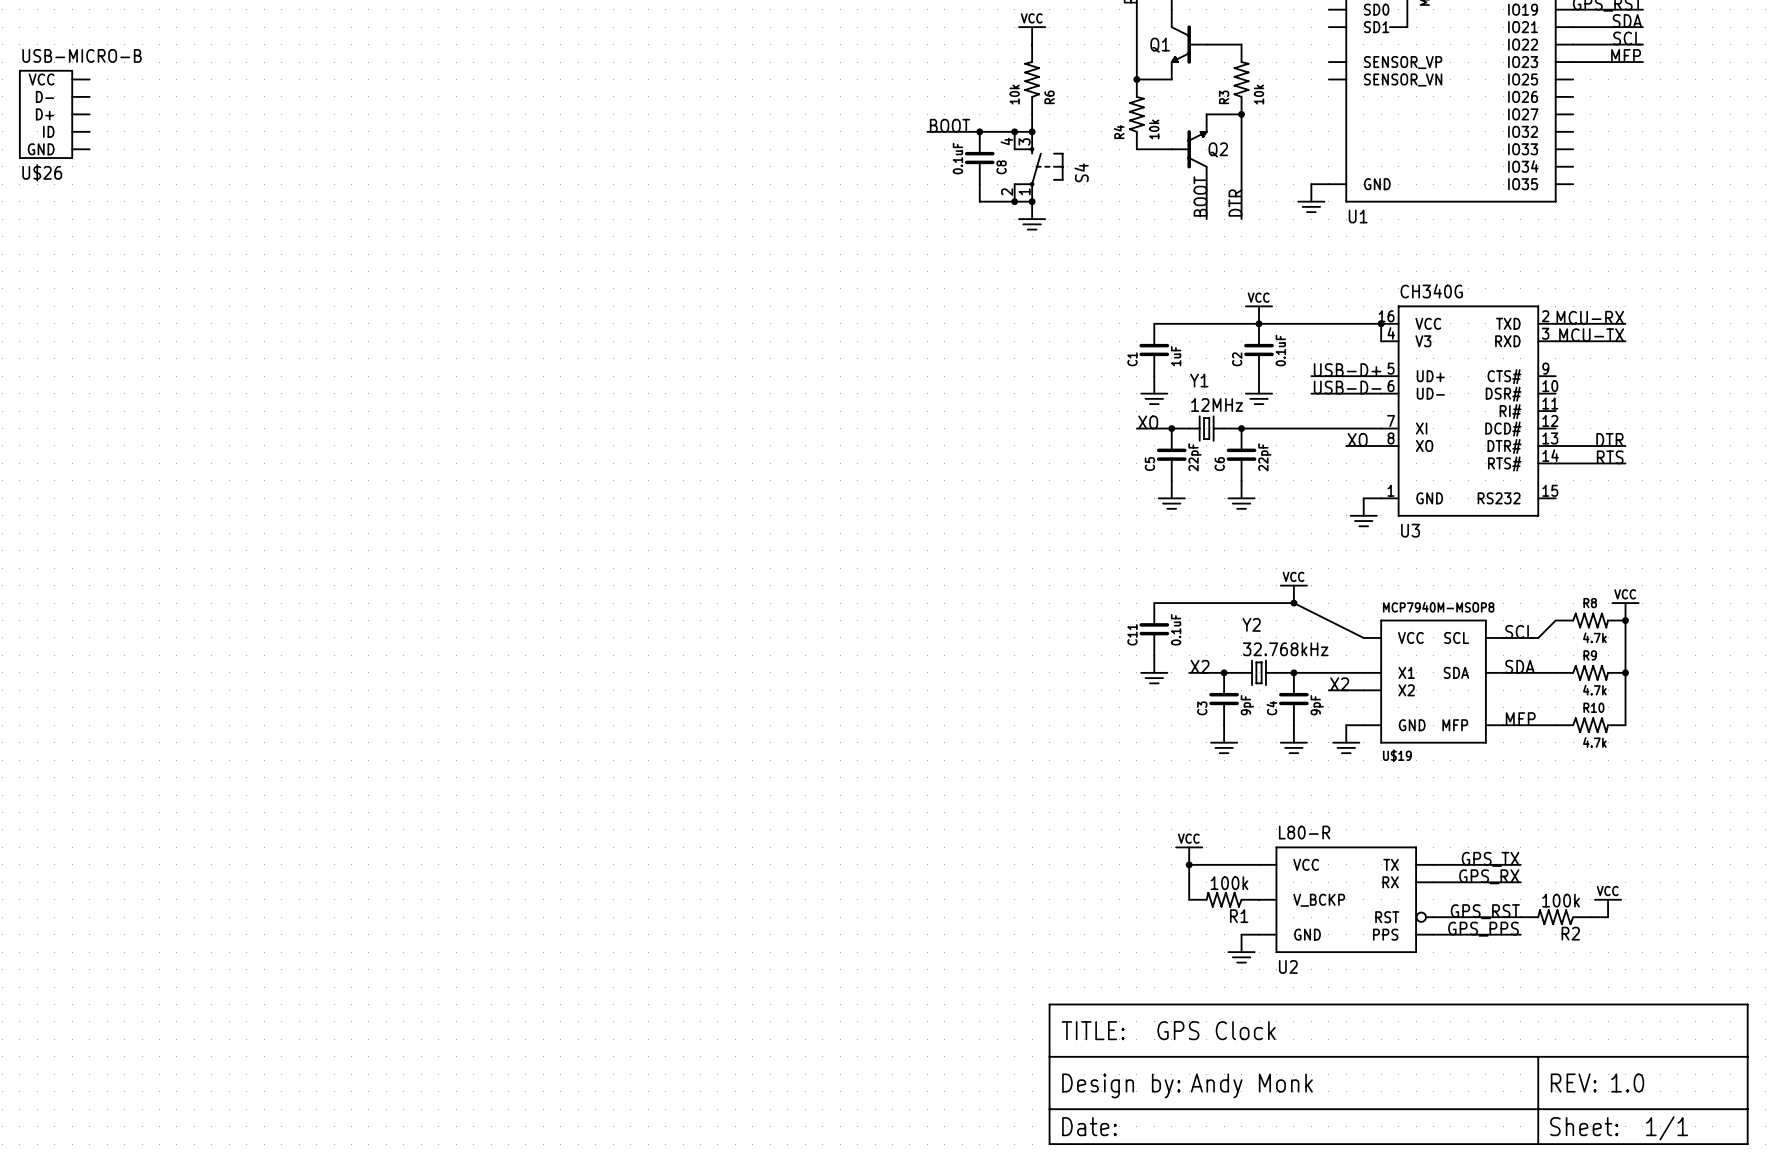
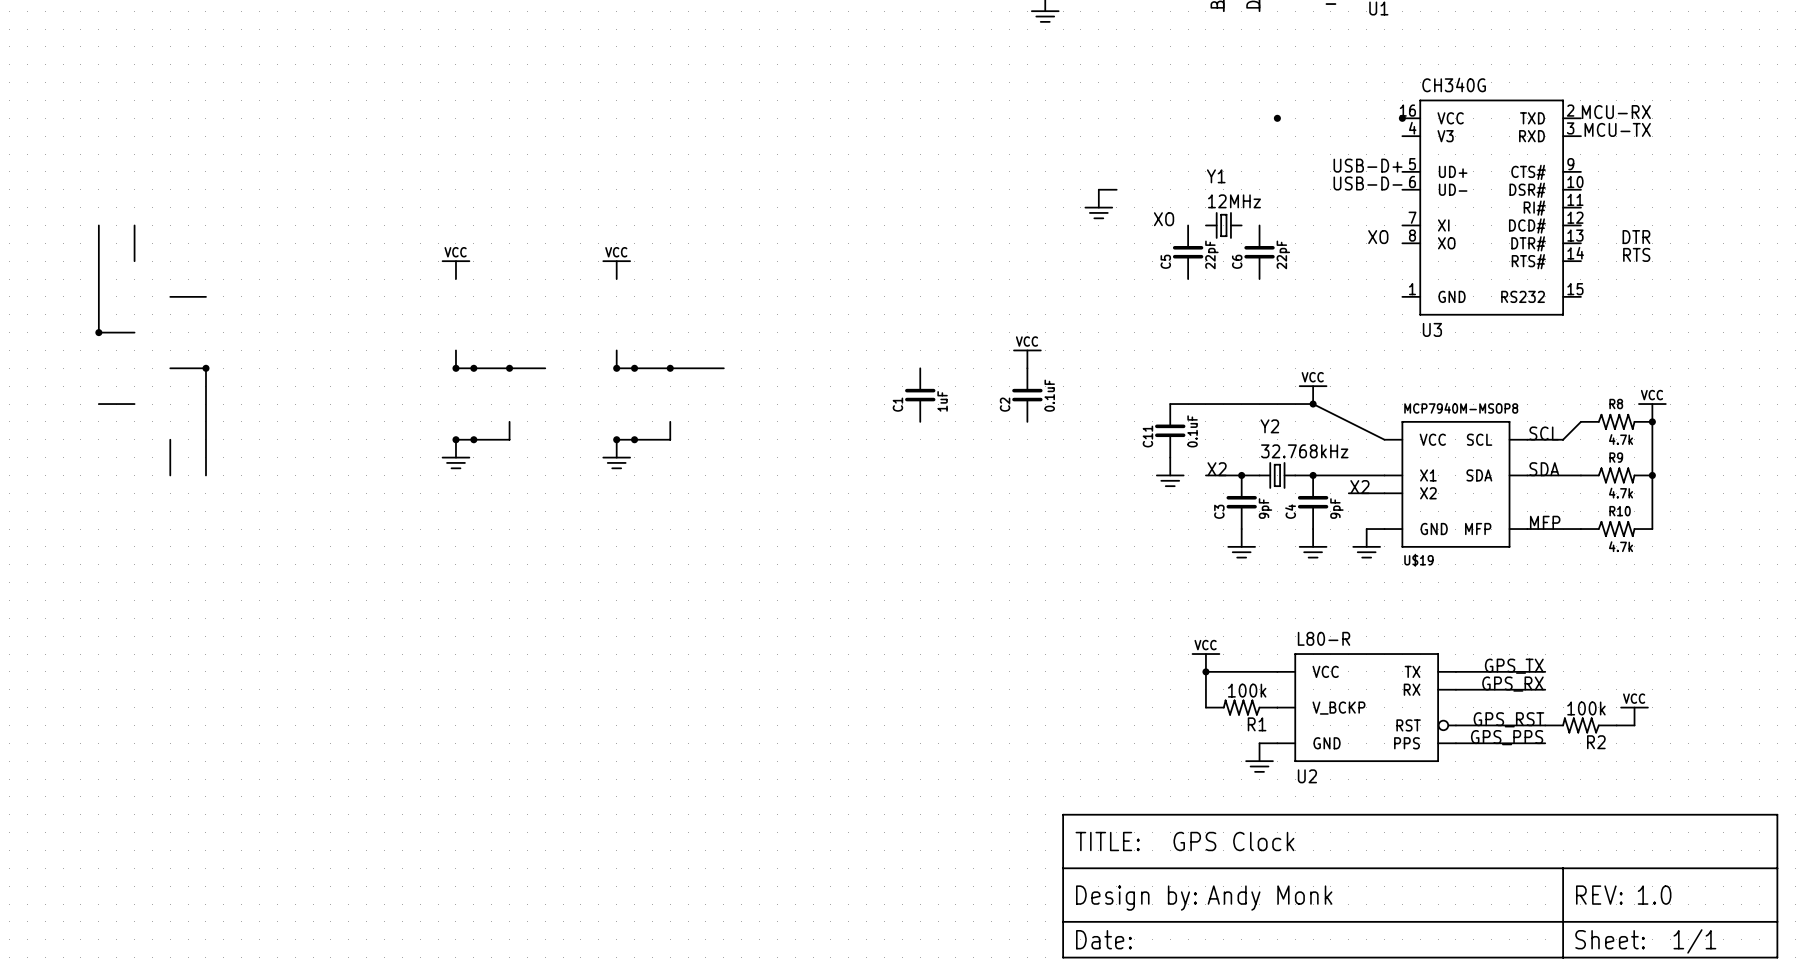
power symbol: (1259, 314) -> none
wire: (1154, 323) (1381, 323) (1381, 341) -> none
wire: (1555, 323) (1625, 323) -> none
wire: (1555, 341) (1625, 341) -> none
C1 position: (1154, 350) -> (920, 395)
C2 position: (1259, 350) -> (1027, 395)
wire: (1311, 376) (1381, 376) -> none
power symbol: (1154, 390) -> none
power symbol: (1259, 390) -> none
wire: none -> (1098, 189) (1116, 189)
wire: (1311, 393) (1381, 393) -> none
power symbol: none -> (1098, 204)
wire: none -> (98, 225) (98, 332) (134, 332)
wire: none -> (134, 225) (134, 261)
wire: (1136, 428) (1189, 428) -> none
junction: (1171, 428) -> none
wire: (1224, 428) (1381, 428) -> none
junction: (1241, 428) -> none
wire: (1346, 445) (1381, 445) -> none
wire: (1555, 445) (1625, 445) -> none
wire: (1555, 463) (1625, 463) -> none
power symbol: none -> (455, 269)
power symbol: none -> (616, 269)
power symbol: (1171, 495) -> none
power symbol: (1241, 495) -> none
wire: none -> (170, 296) (205, 296)
wire: (1363, 498) (1381, 498) -> none
power symbol: (1363, 512) -> none
junction: none -> (98, 332)
wire: none -> (455, 350) (455, 368) (545, 368)
wire: none -> (616, 350) (616, 368) (723, 368)
power symbol: none -> (1027, 358)
wire: none -> (170, 368) (205, 368) (205, 475)
junction: none -> (205, 368)
junction: none -> (455, 368)
junction: none -> (473, 368)
junction: none -> (509, 368)
junction: none -> (616, 368)
junction: none -> (634, 368)
junction: none -> (670, 368)
wire: none -> (98, 404) (134, 404)
wire: none -> (509, 421) (509, 439) (455, 439)
wire: none -> (670, 421) (670, 439) (616, 439)
wire: none -> (170, 439) (170, 475)
junction: none -> (455, 439)
junction: none -> (473, 439)
junction: none -> (616, 439)
junction: none -> (634, 439)
power symbol: none -> (455, 454)
power symbol: none -> (616, 454)

